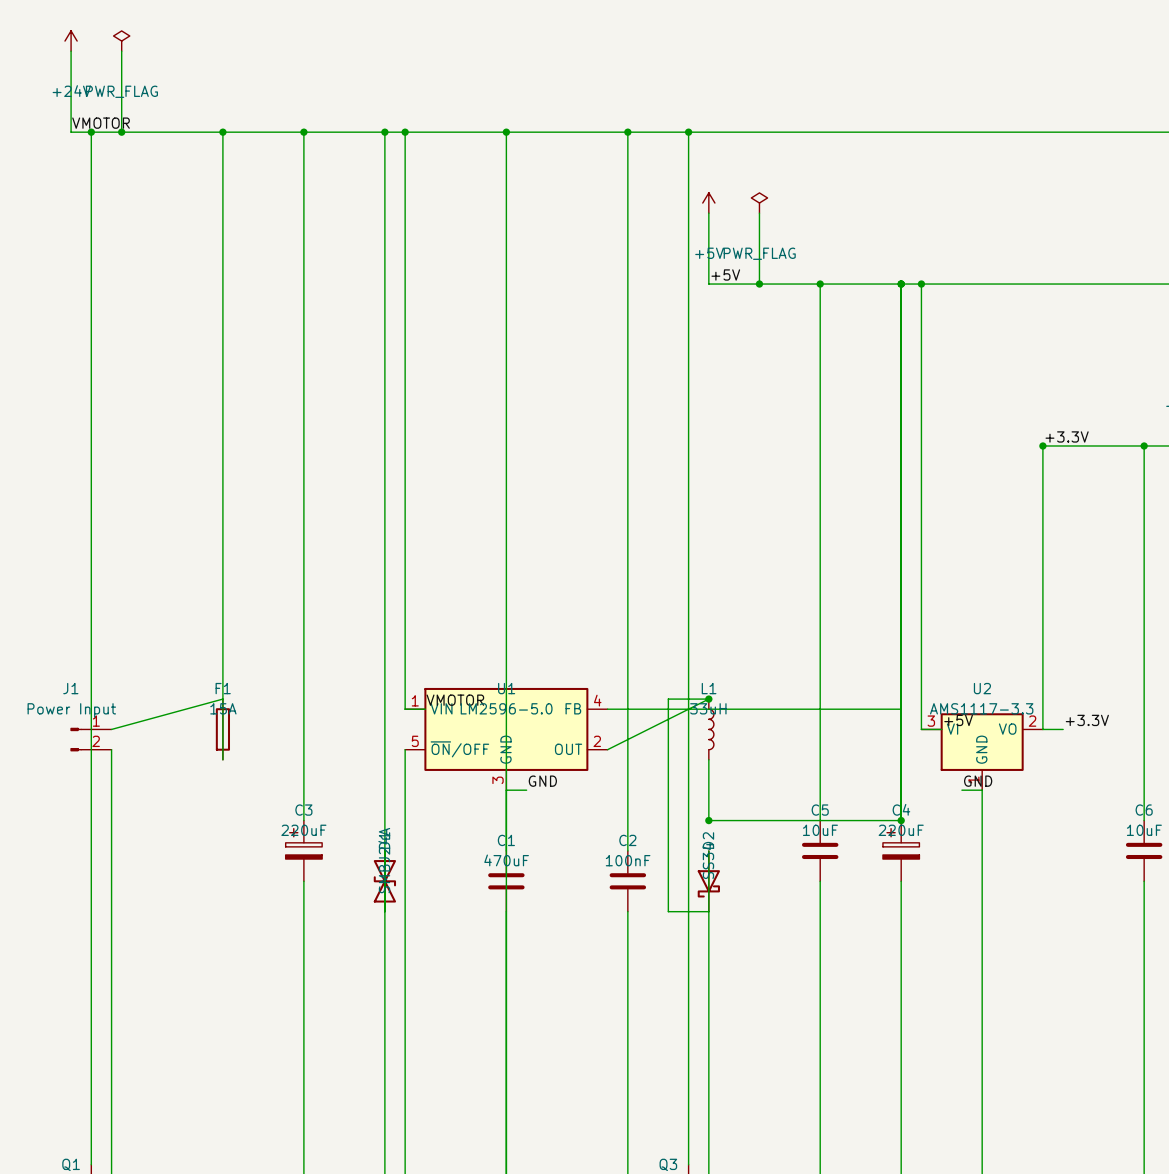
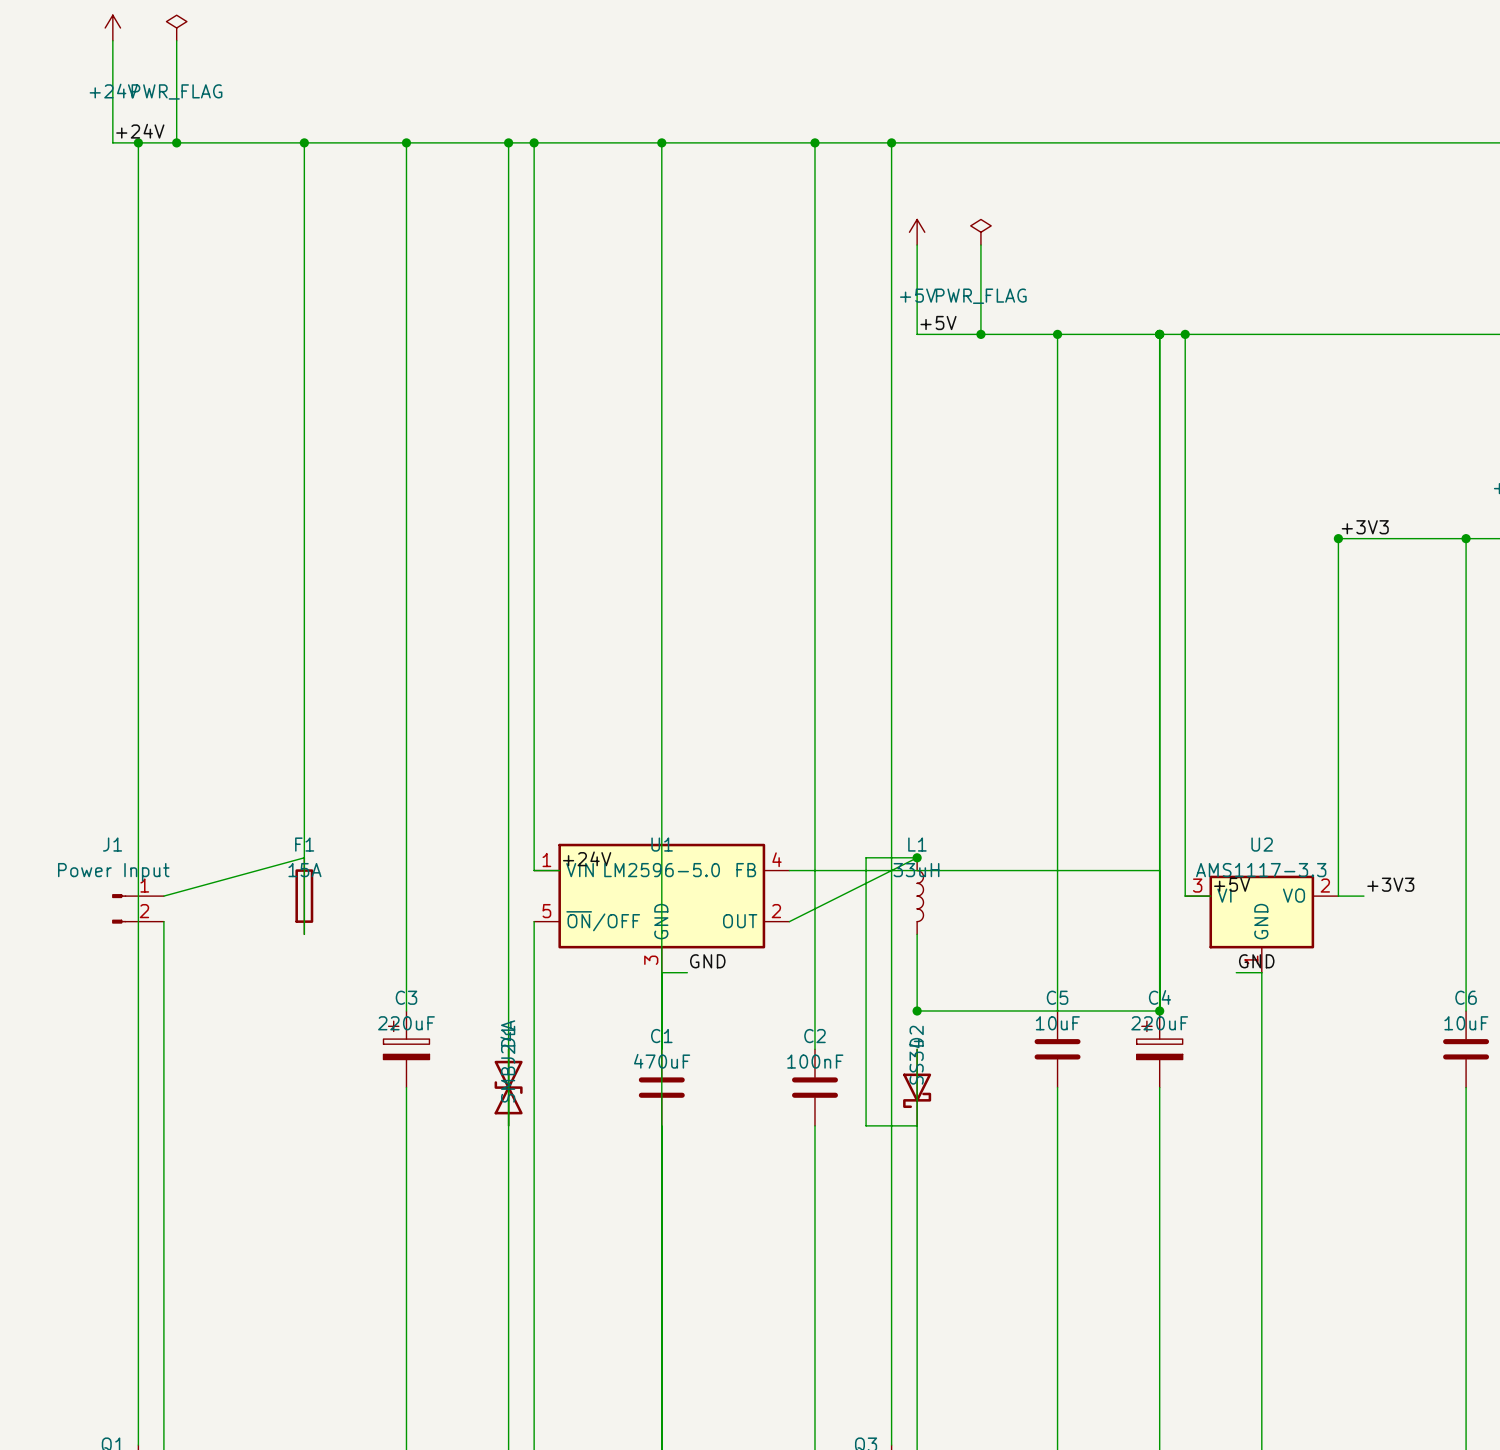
label: VMOTOR (101, 123) -> +24V (140, 131)
label: +3.3V (1067, 436) -> +3V3 (1365, 527)
label: VMOTOR (455, 700) -> +24V (587, 858)
label: +3.3V (1087, 720) -> +3V3 (1390, 884)

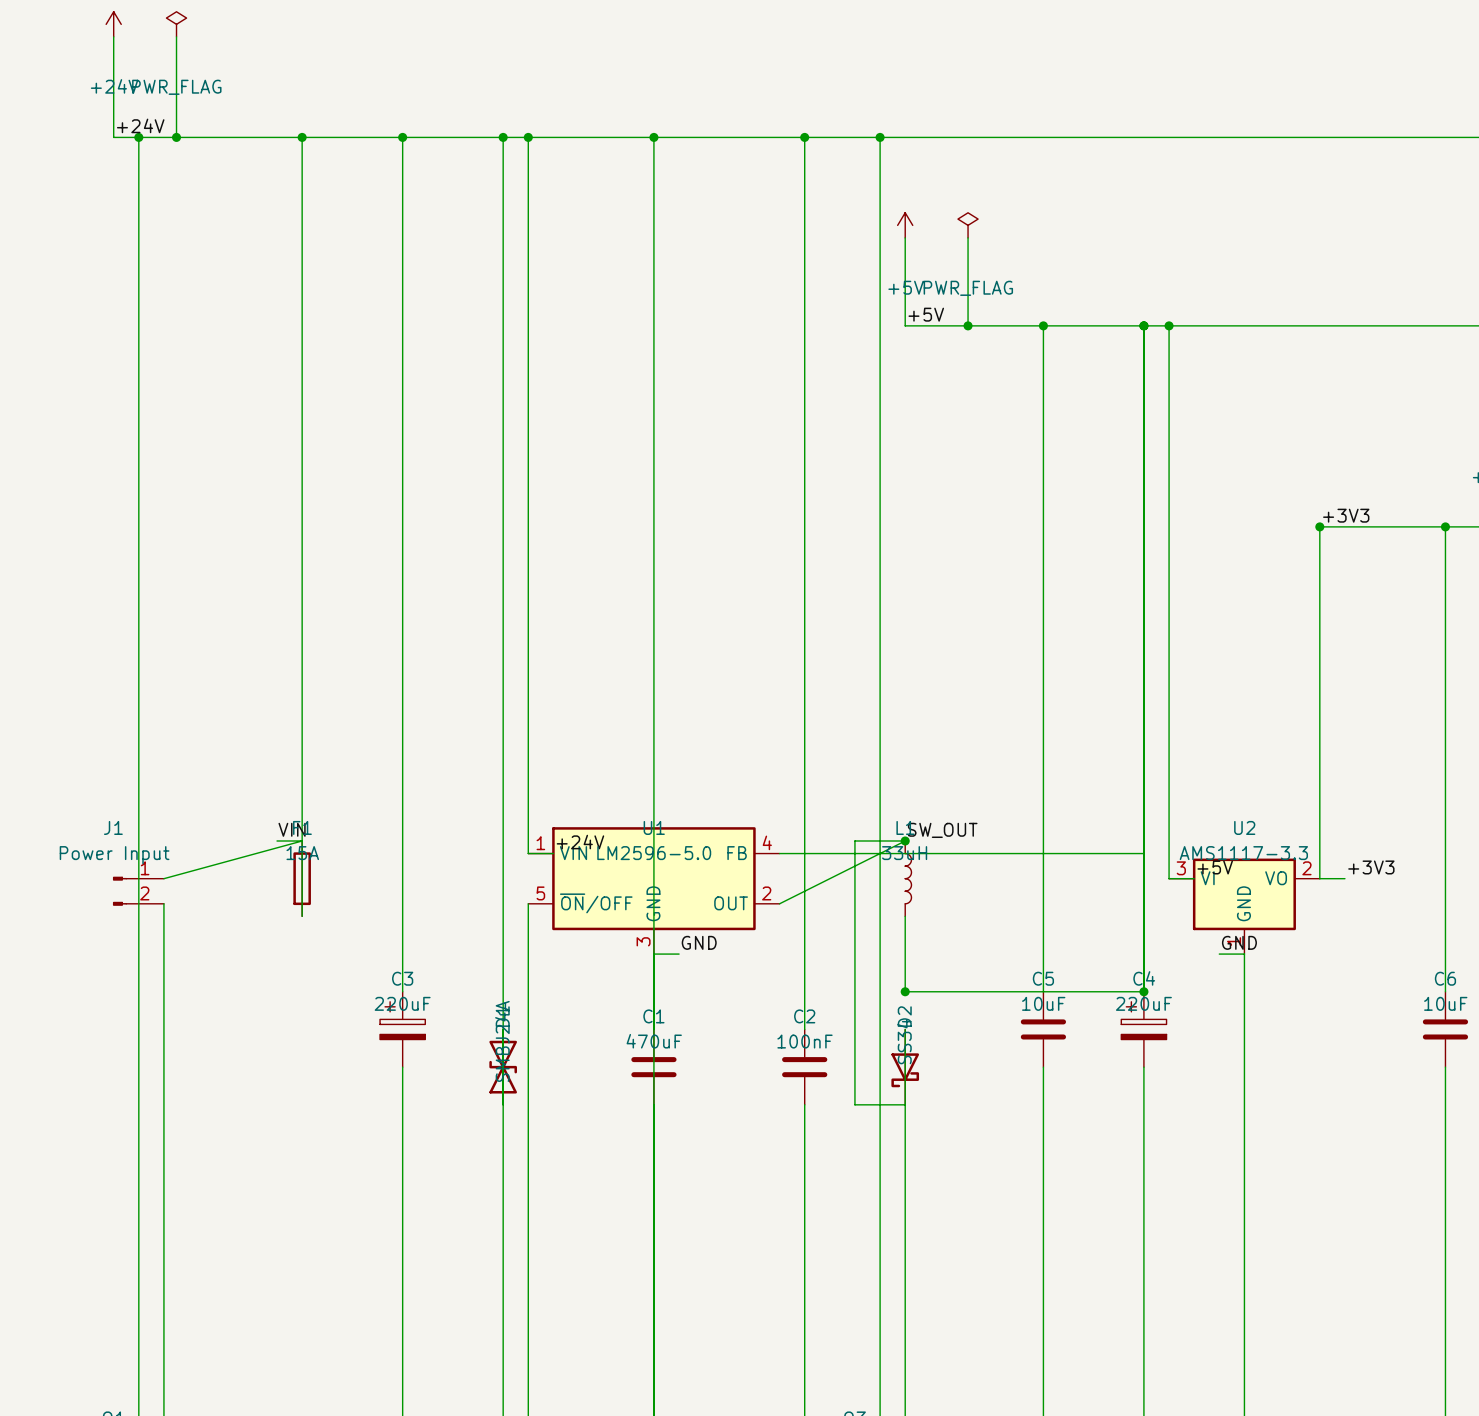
label: none -> VIN (292, 829)
label: none -> SW_OUT (942, 830)
wire: none -> (277, 840) (302, 840)

